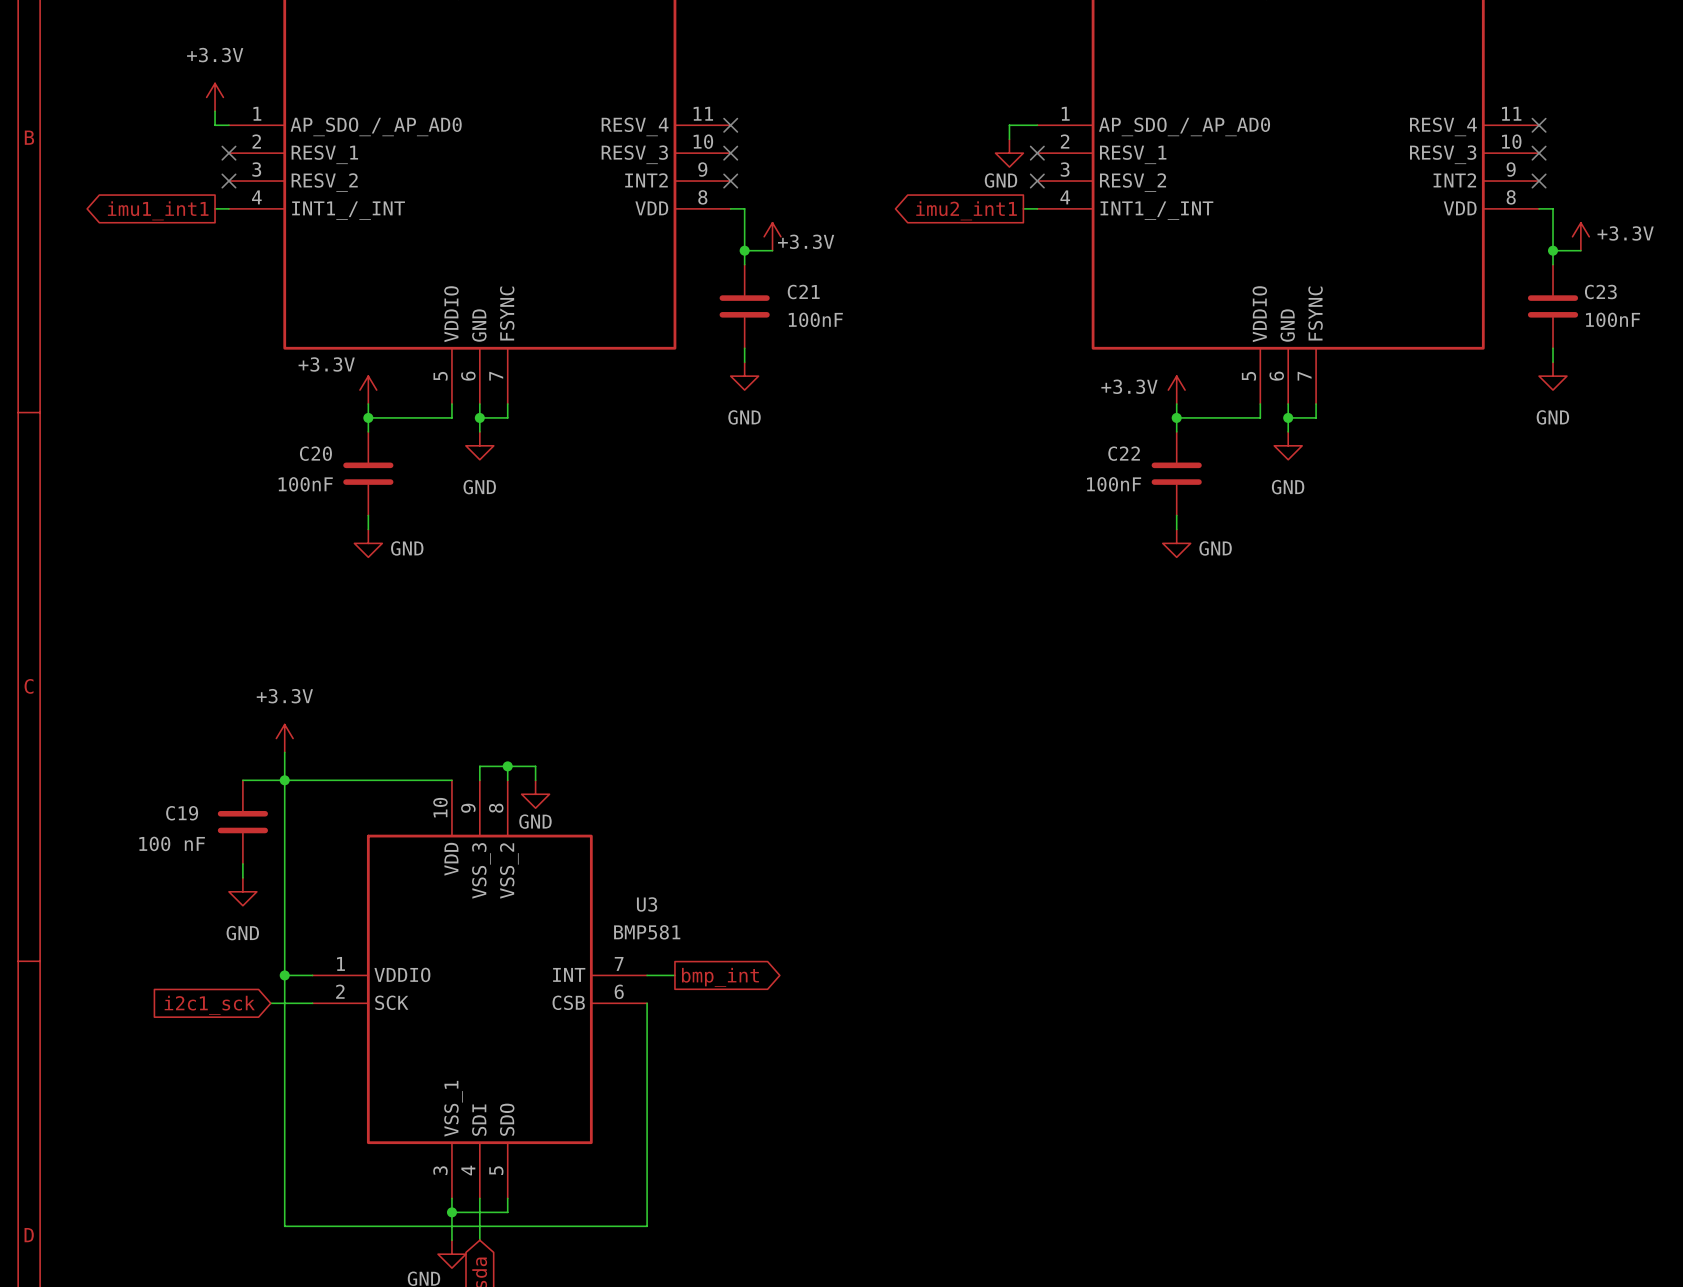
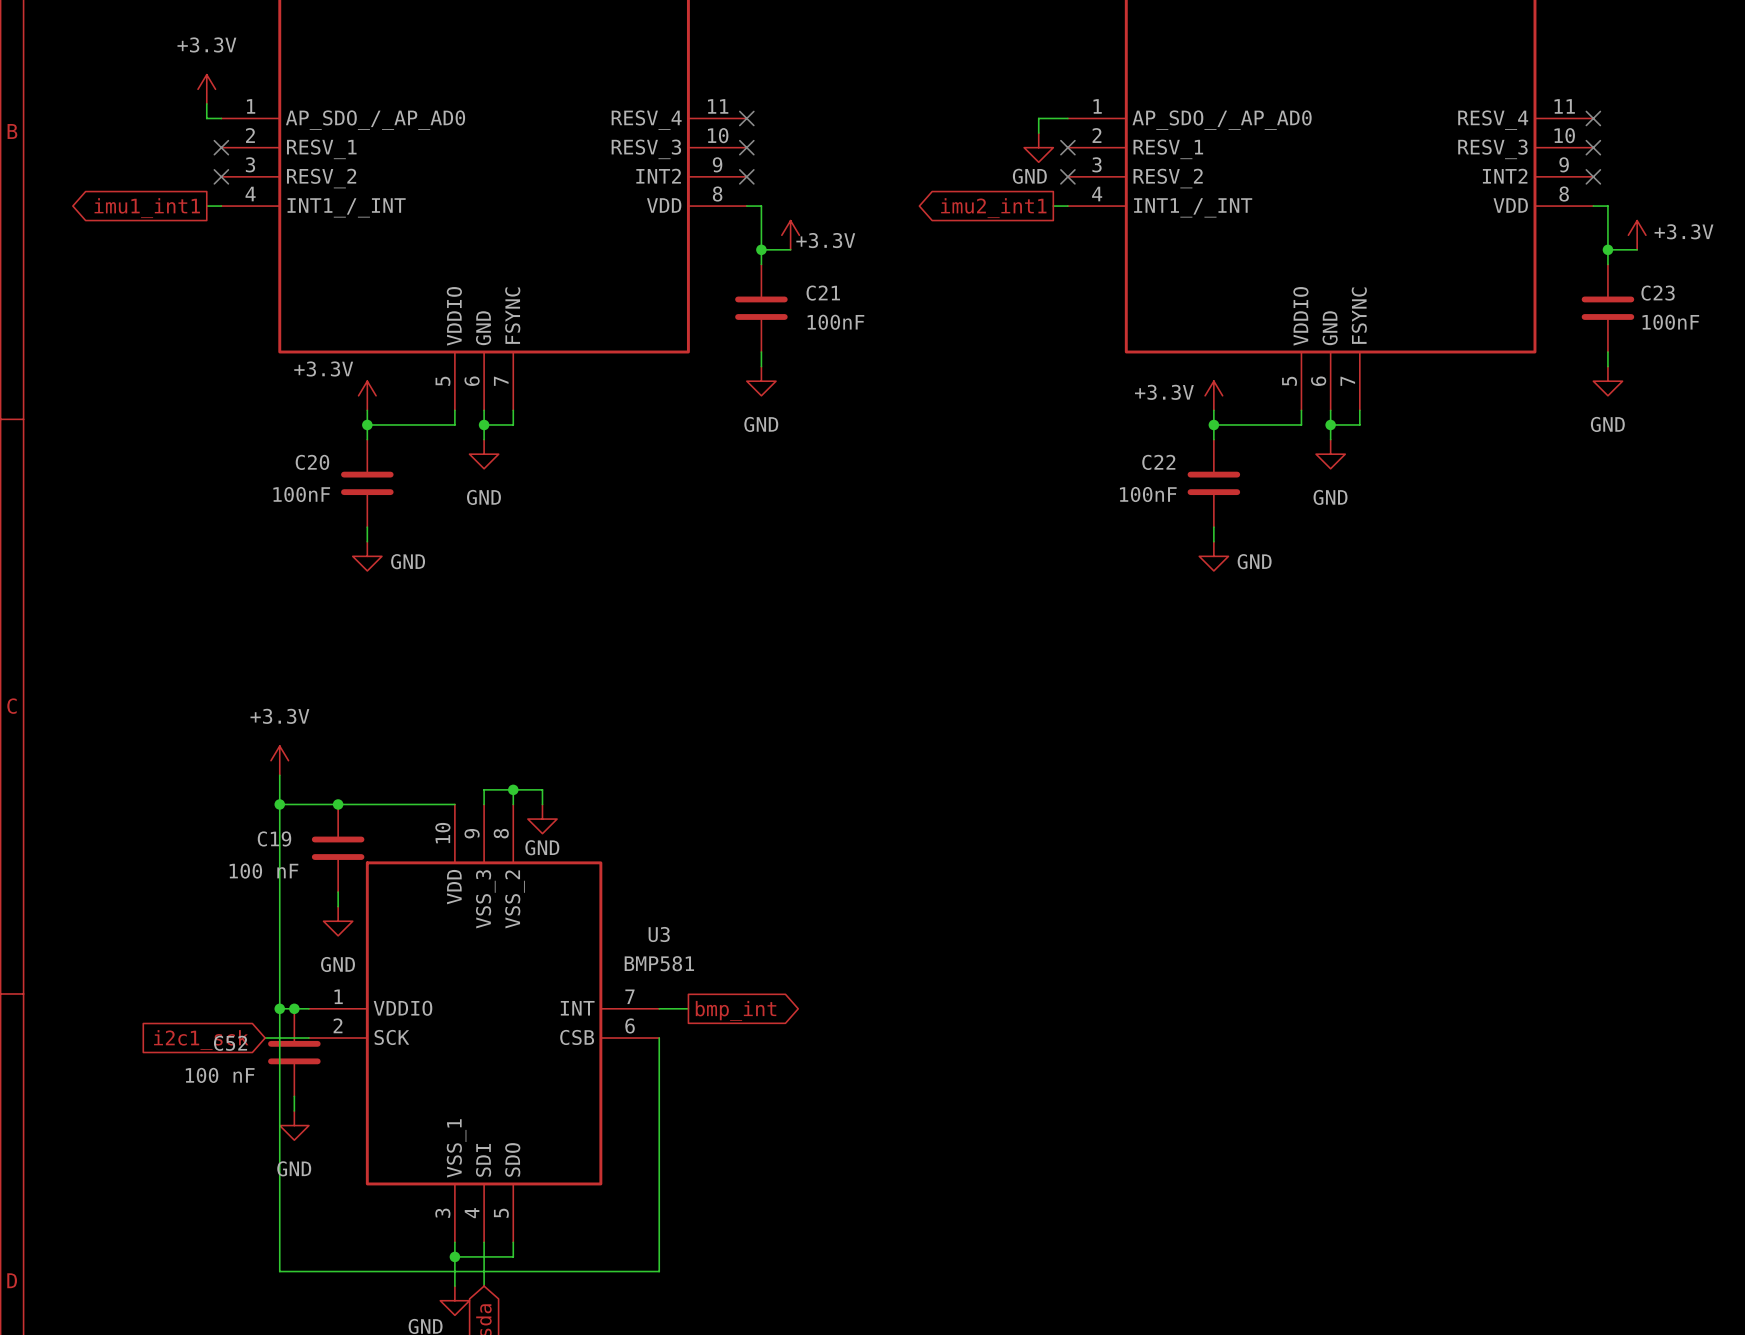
wire: (242, 780) (284, 780) -> none
junction: none -> (338, 804)
C19 position: (242, 822) -> (338, 848)
wire: (242, 863) (242, 877) -> (338, 892) (338, 906)
power symbol position: GND (242, 891) -> GND (338, 921)
junction: none -> (294, 1008)
C52: none -> 100 nF (294, 1052)
wire: none -> (294, 1096) (294, 1110)
power symbol: none -> GND (294, 1125)

